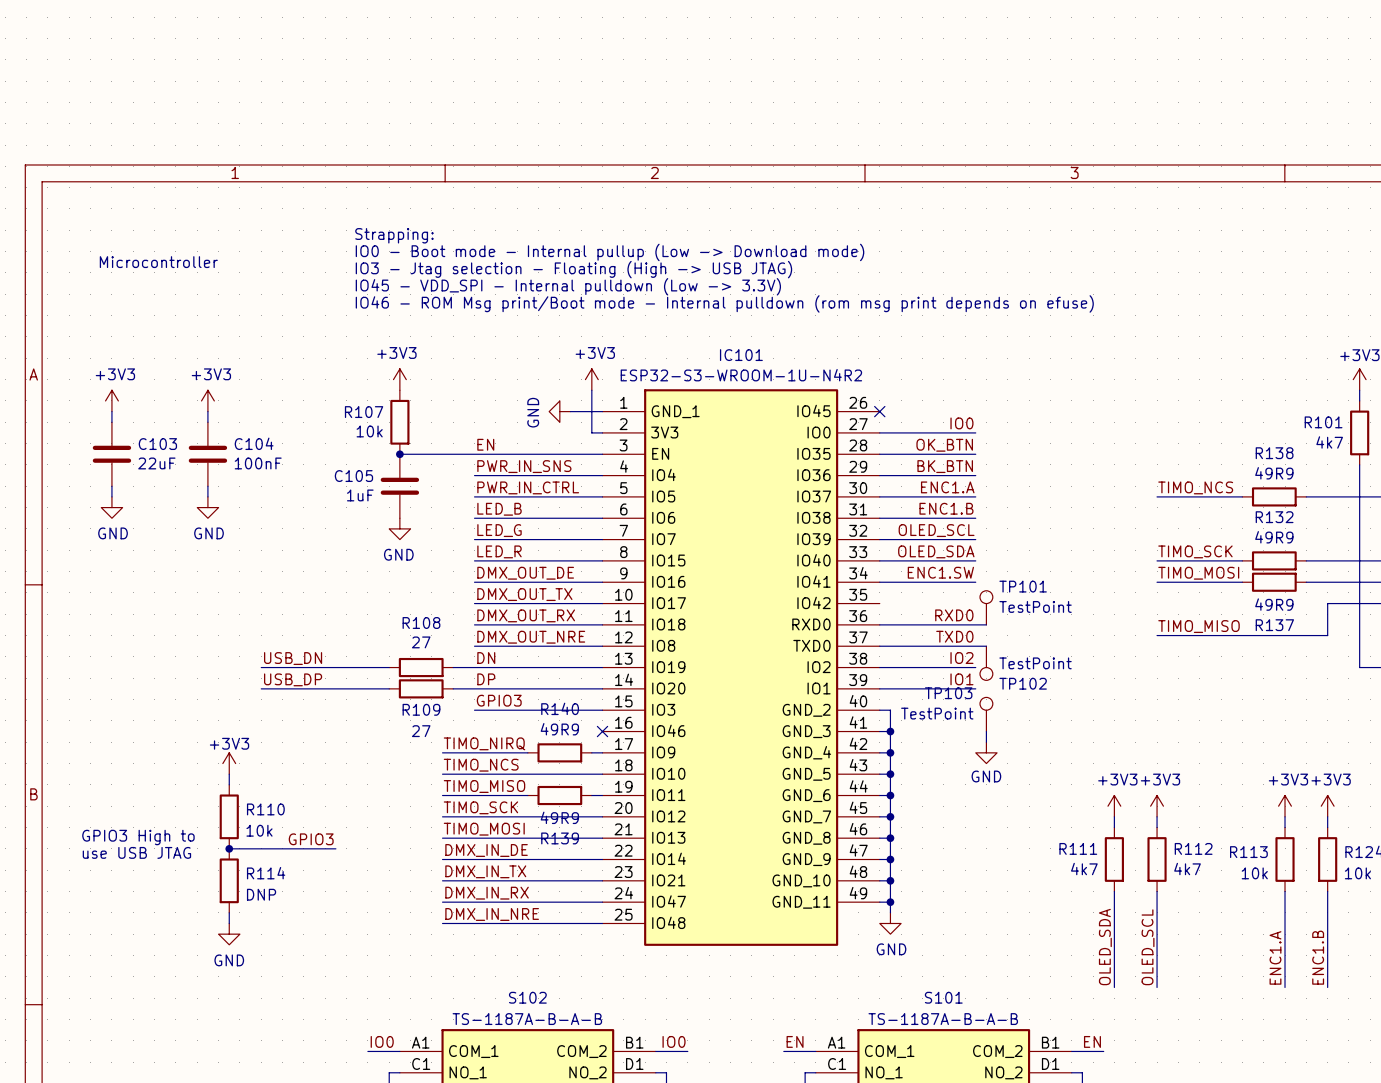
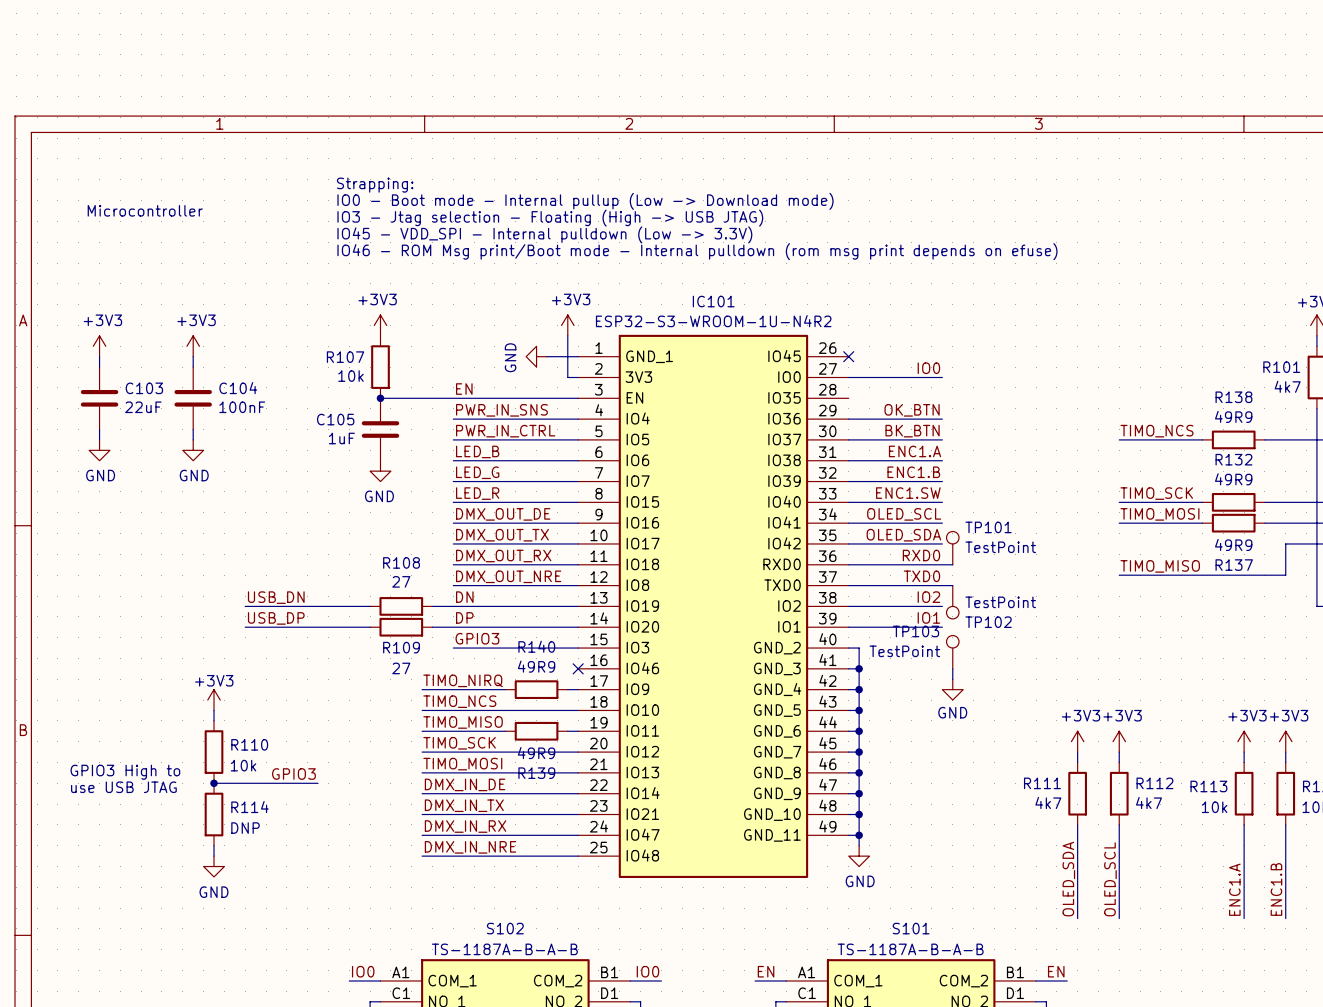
label: OK_BTN (944, 445) -> none
wire: (879, 454) (975, 454) -> (848, 543) (942, 543)
label: BK_BTN (945, 466) -> OK_BTN (912, 410)
label: ENC1.A (947, 487) -> BK_BTN (912, 431)
label: ENC1.B (946, 508) -> ENC1.A (915, 451)
label: OLED_SCL (936, 530) -> ENC1.B (913, 472)
label: OLED_SDA (936, 551) -> ENC1.SW (908, 493)
label: ENC1.SW (940, 572) -> OLED_SCL (904, 514)
label: none -> OLED_SDA (903, 535)

